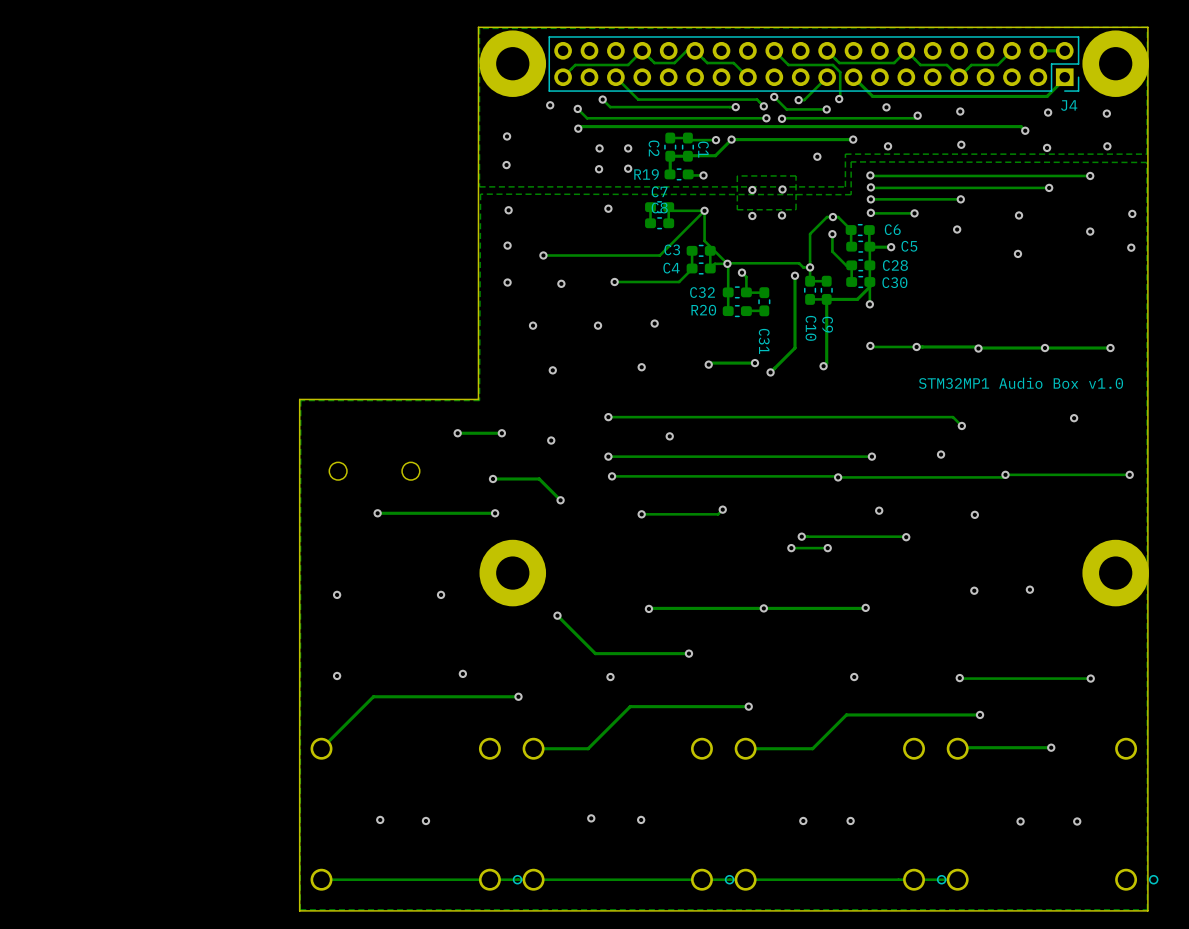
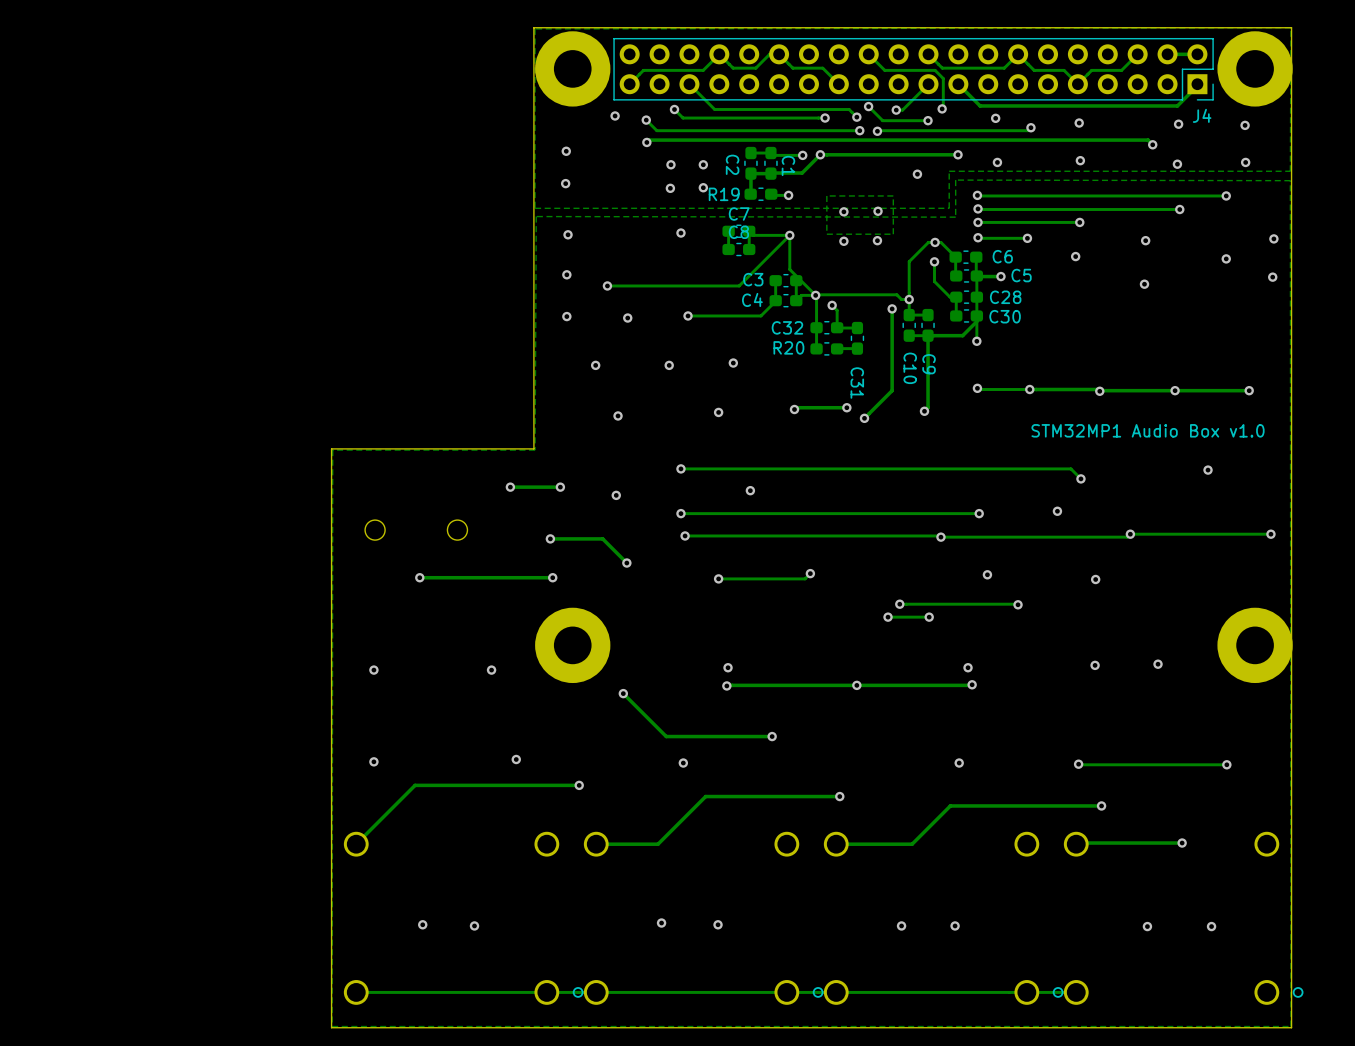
via: none -> (728, 667)
via: none -> (968, 667)

